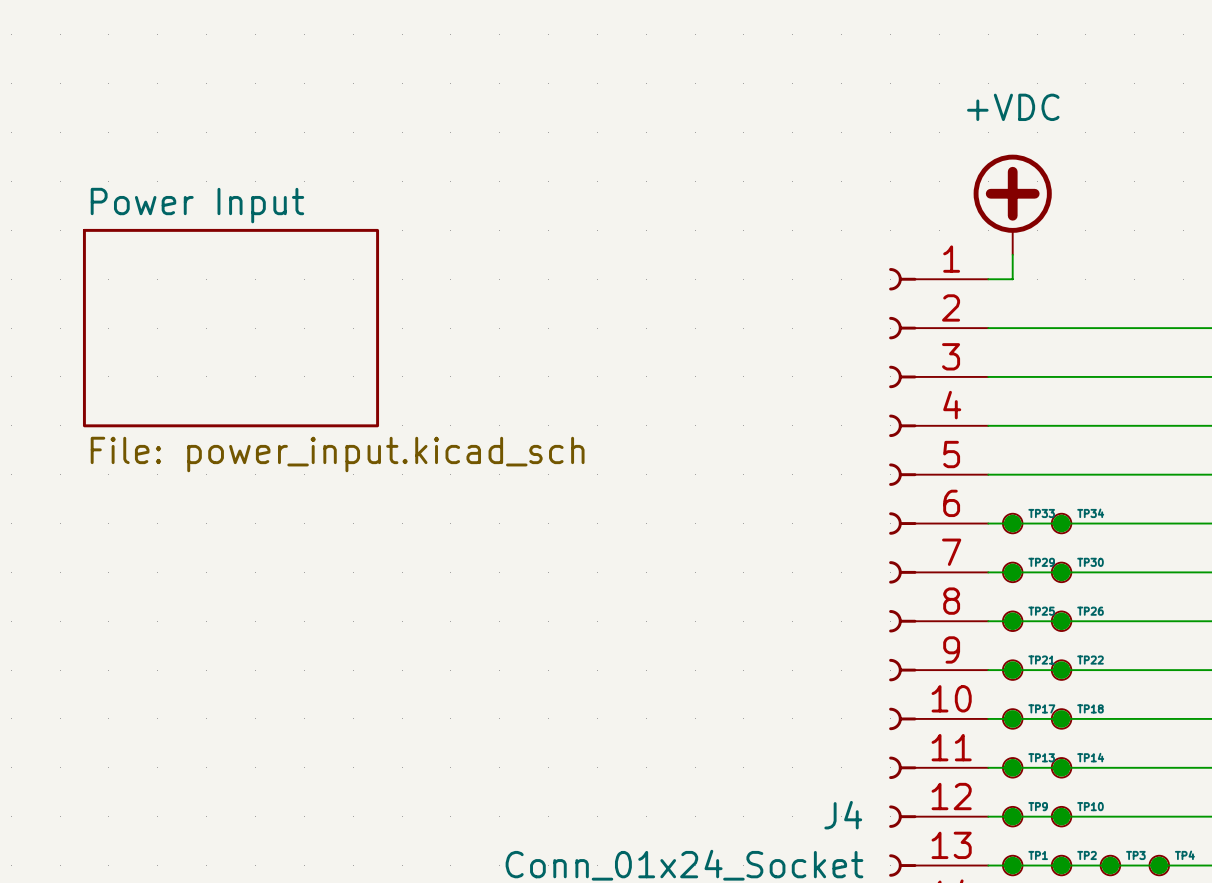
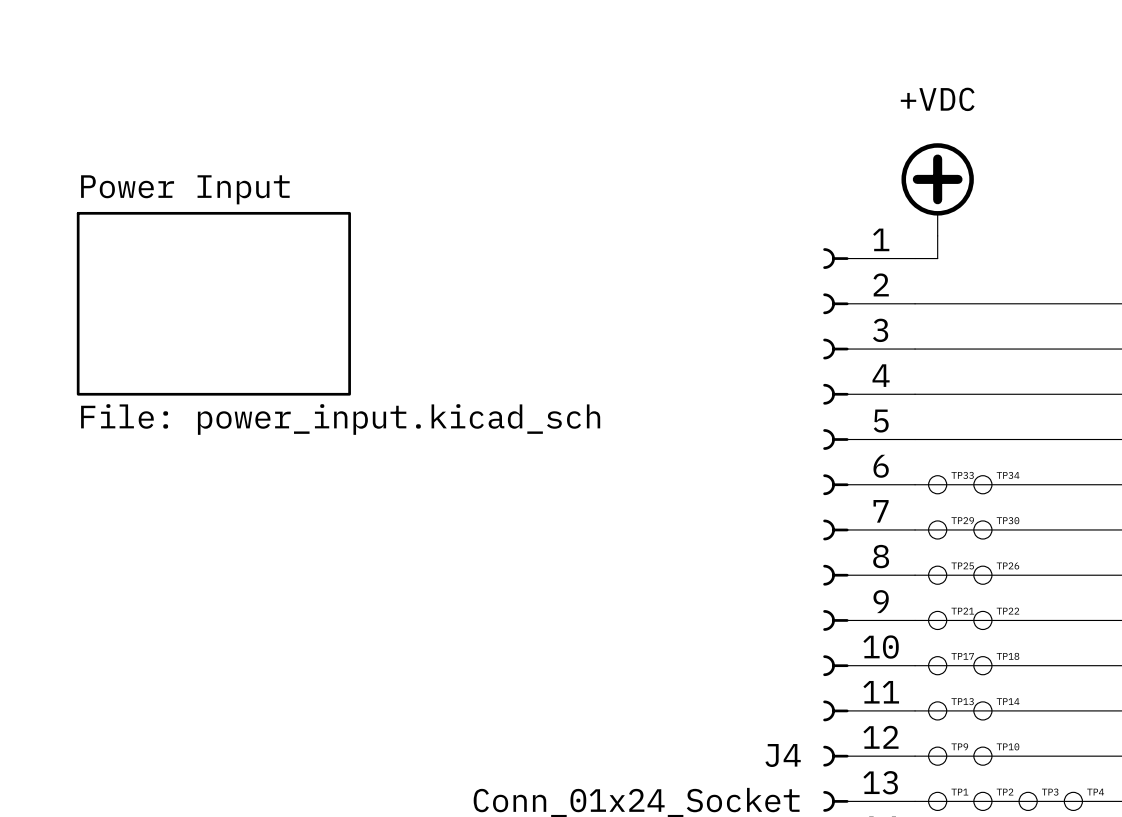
junction: (1012, 523) -> none
junction: (1061, 523) -> none
junction: (1012, 572) -> none
junction: (1061, 572) -> none
junction: (1012, 621) -> none
junction: (1061, 621) -> none
junction: (1012, 670) -> none
junction: (1061, 670) -> none
junction: (1012, 718) -> none
junction: (1061, 718) -> none
junction: (1012, 767) -> none
junction: (1061, 767) -> none
junction: (1012, 816) -> none
junction: (1061, 816) -> none
junction: (1012, 865) -> none
junction: (1061, 865) -> none
junction: (1110, 865) -> none
junction: (1159, 865) -> none

